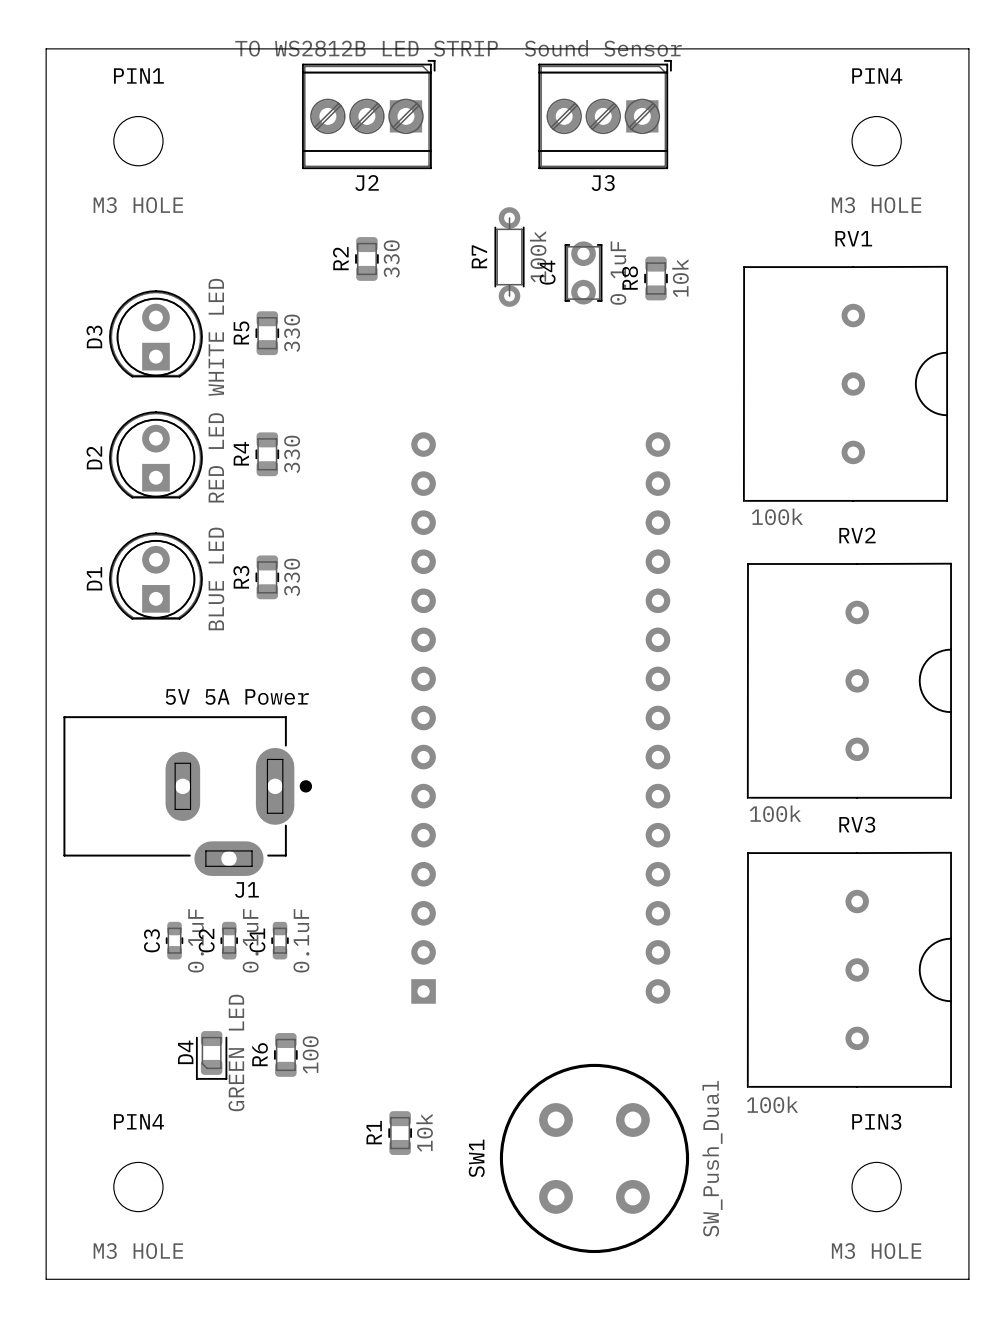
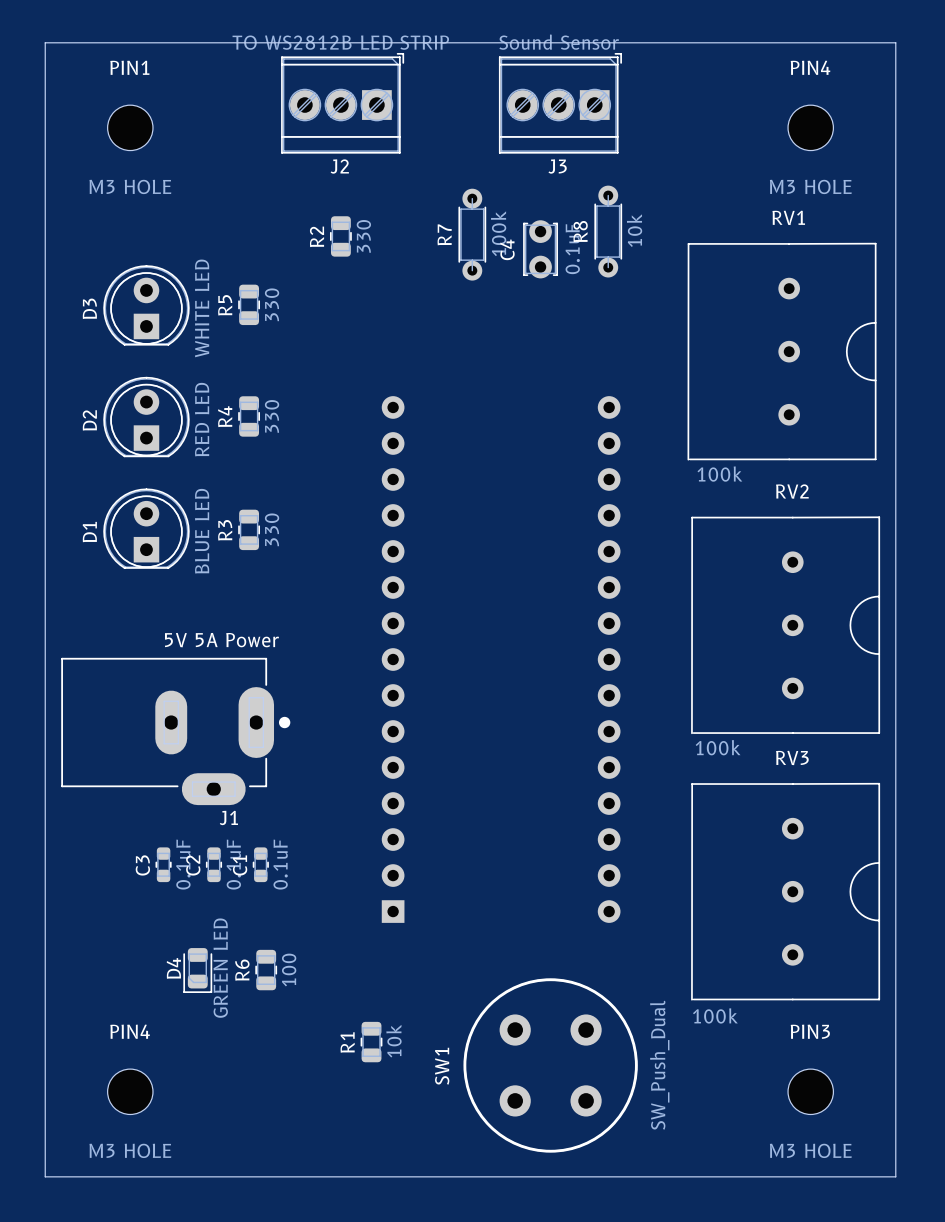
R8 footprint: [644, 256, 668, 301] -> [594, 185, 623, 278]

